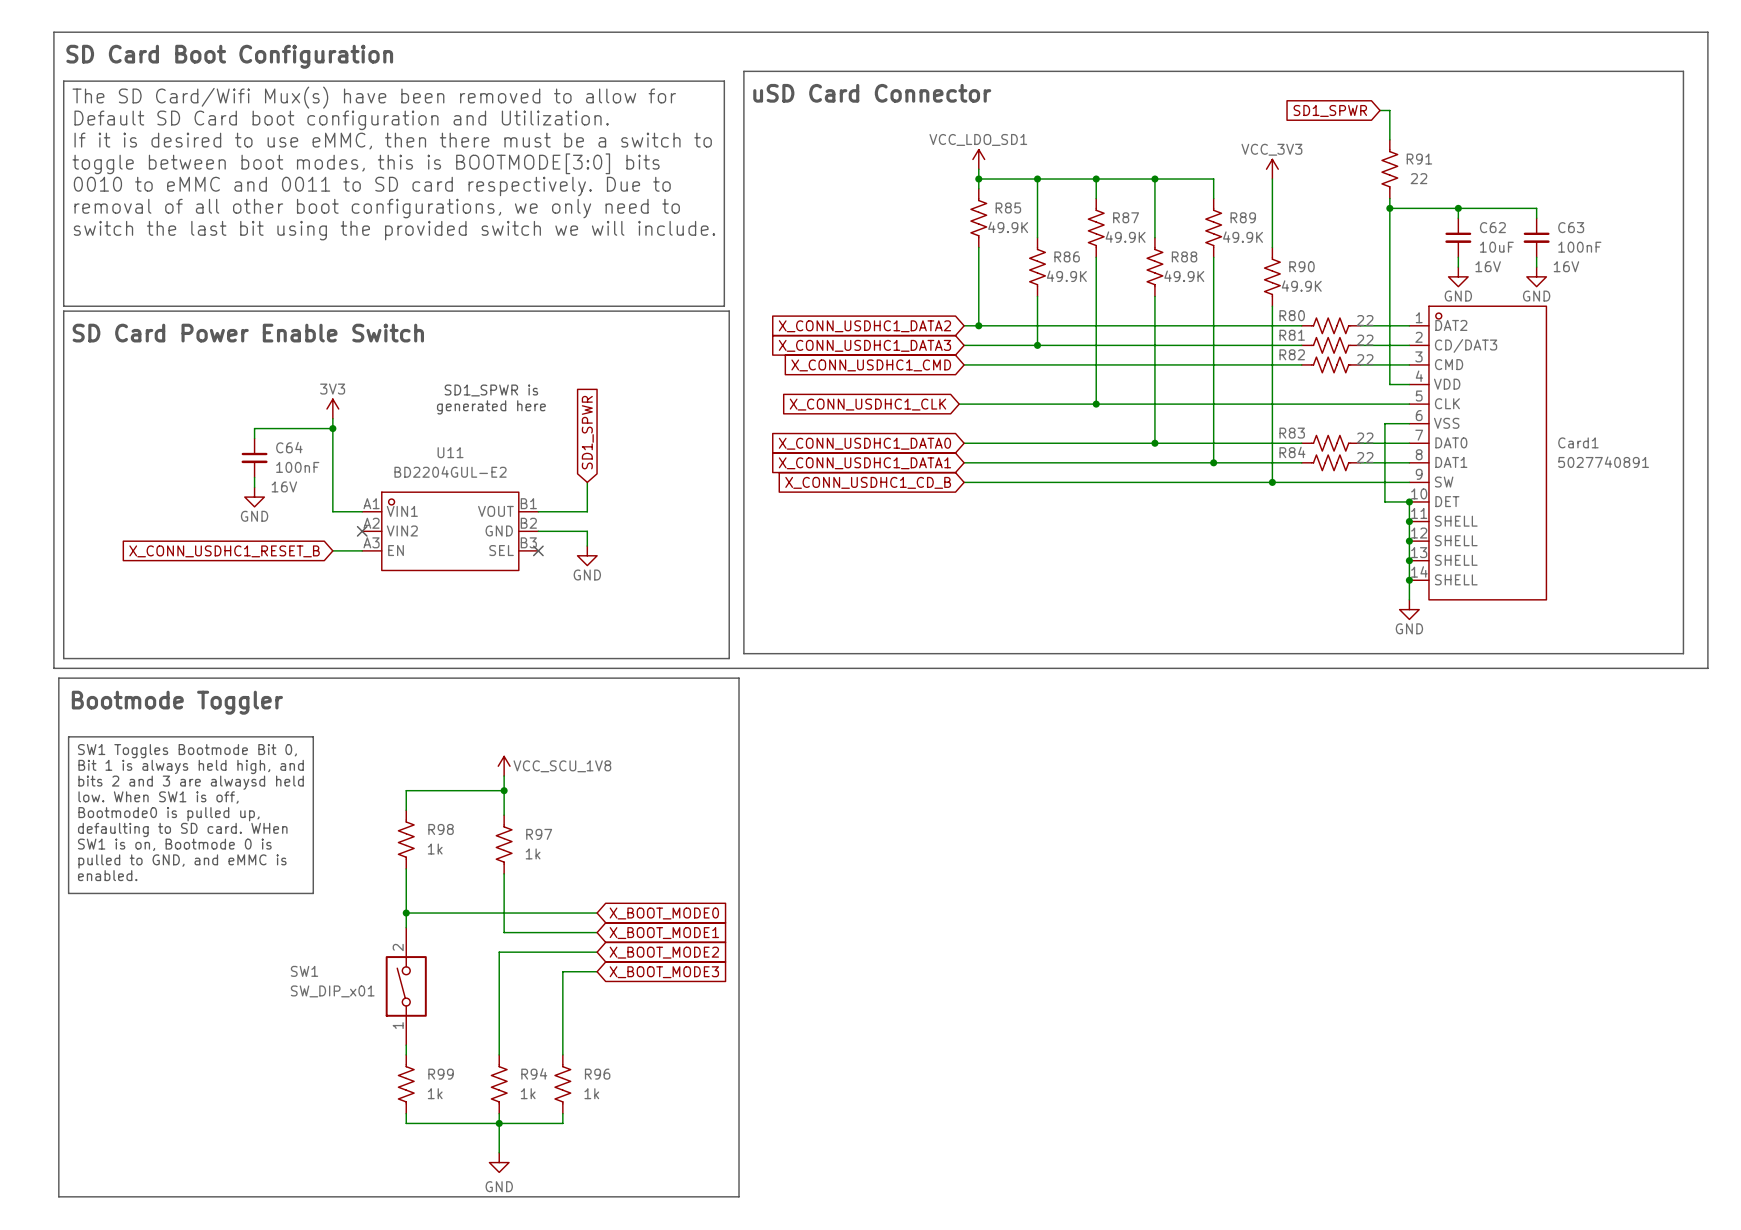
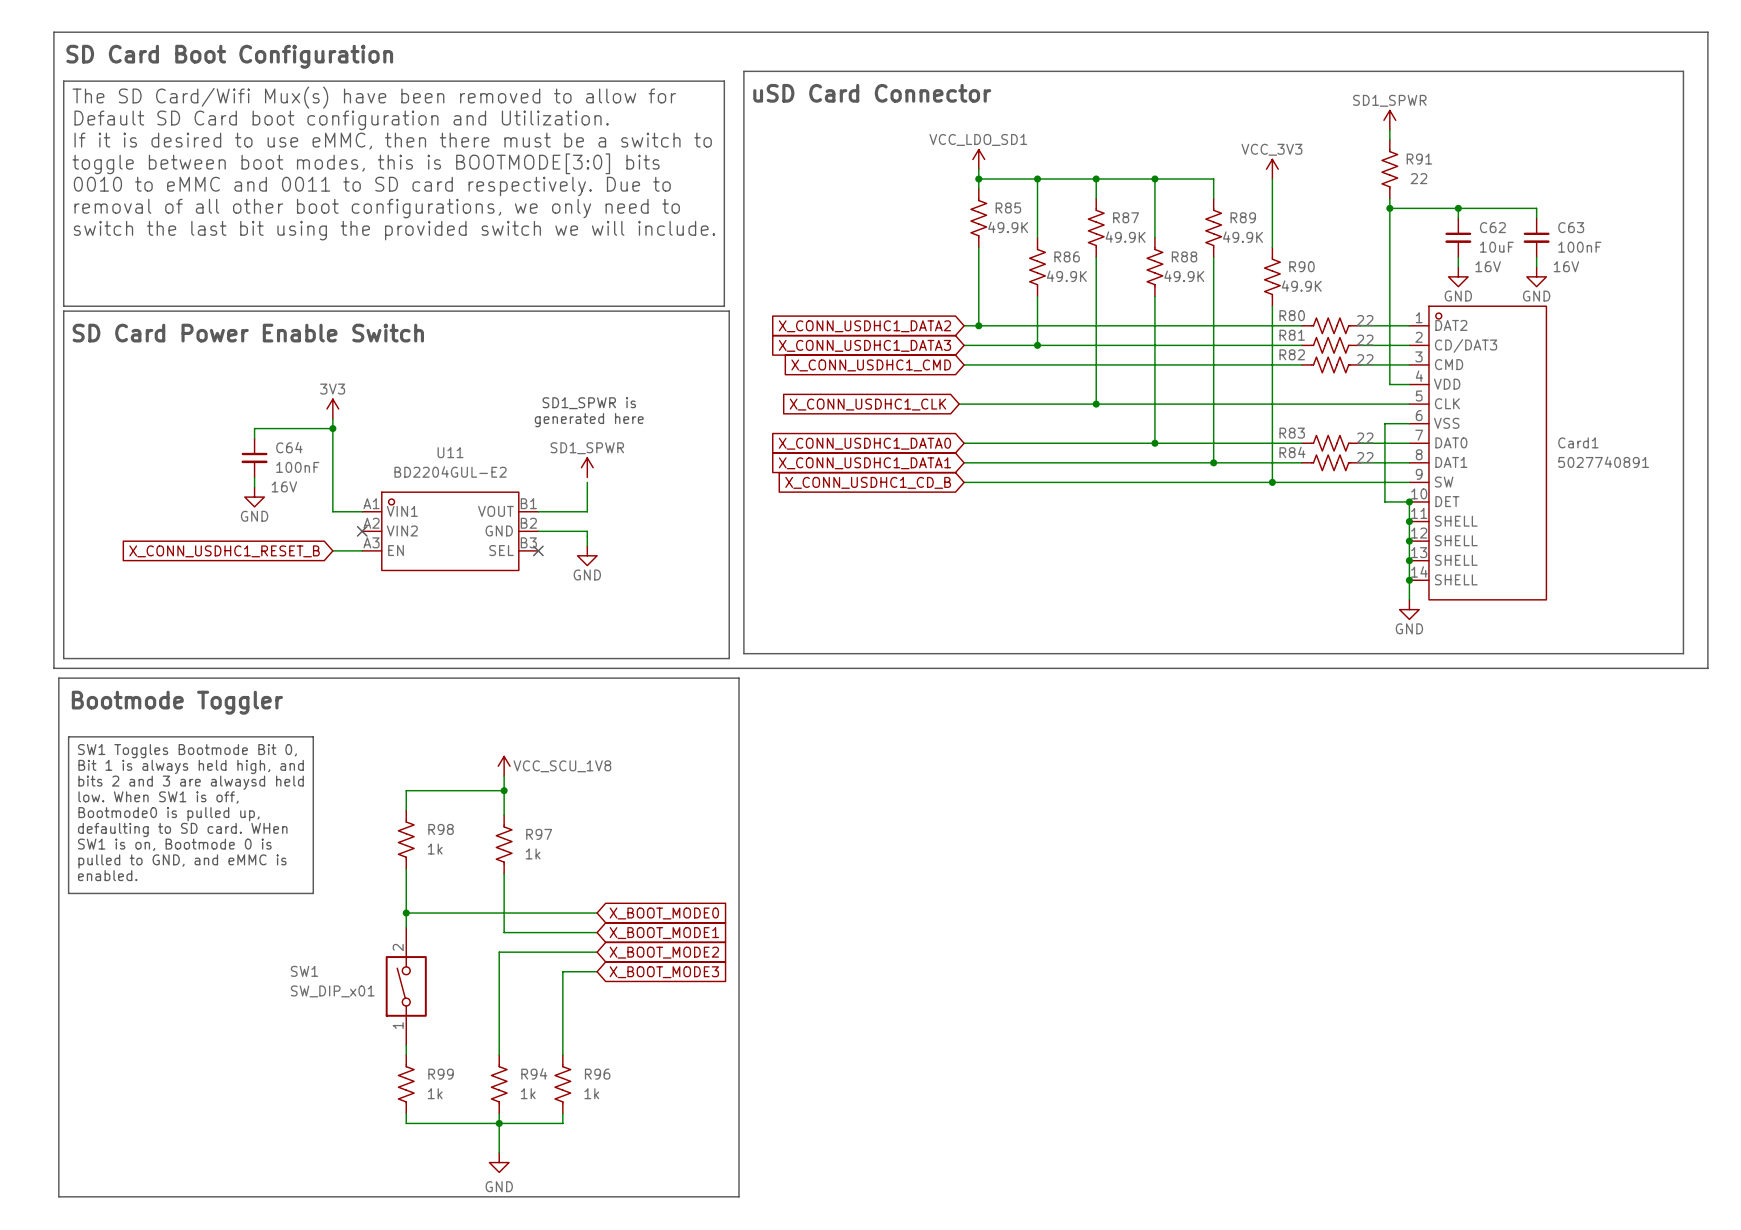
global label: SD1_SPWR (1330, 110) -> none
power symbol: none -> SD1_SPWR (1389, 120)
text position: SD1_SPWR is (491, 390) -> SD1_SPWR is (589, 403)
text position: generated here (491, 407) -> generated here (589, 420)
global label: SD1_SPWR (587, 432) -> none
power symbol: none -> SD1_SPWR (587, 467)

